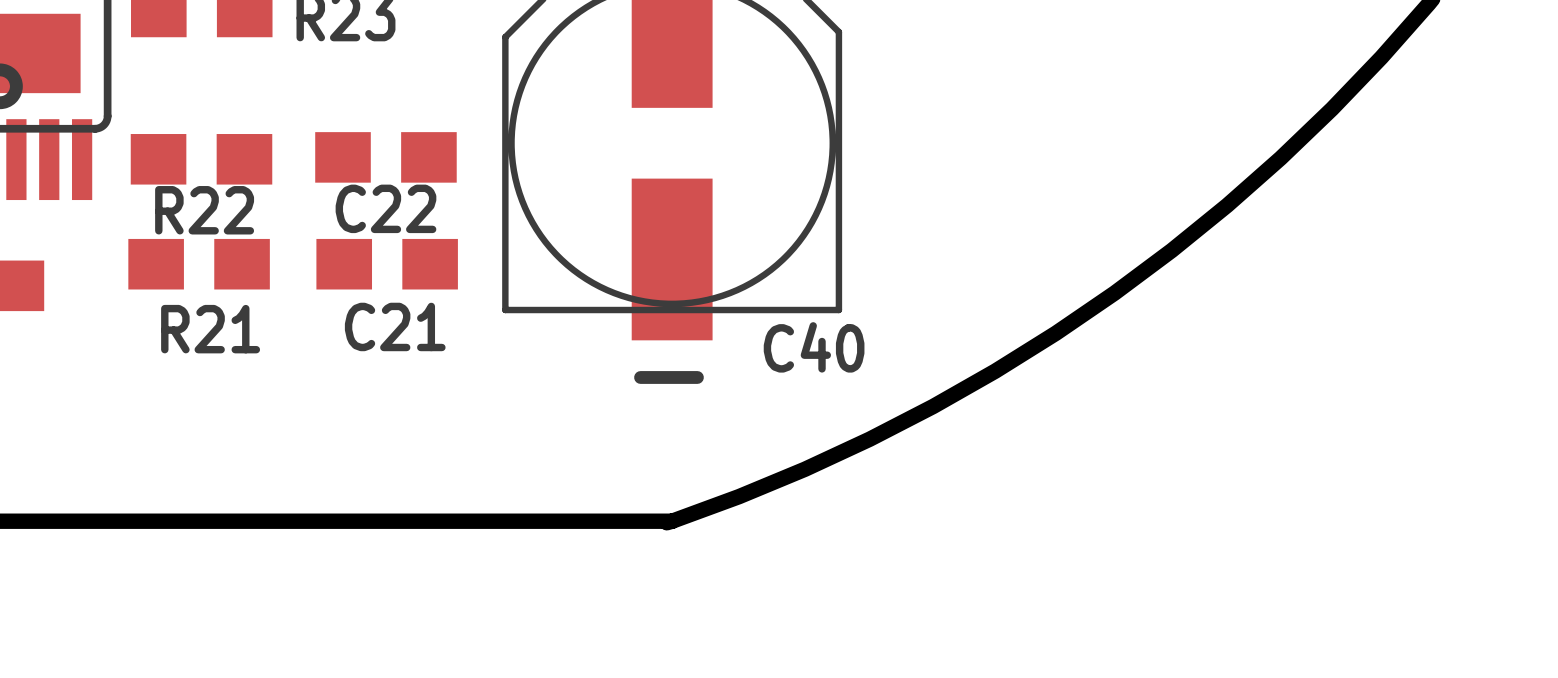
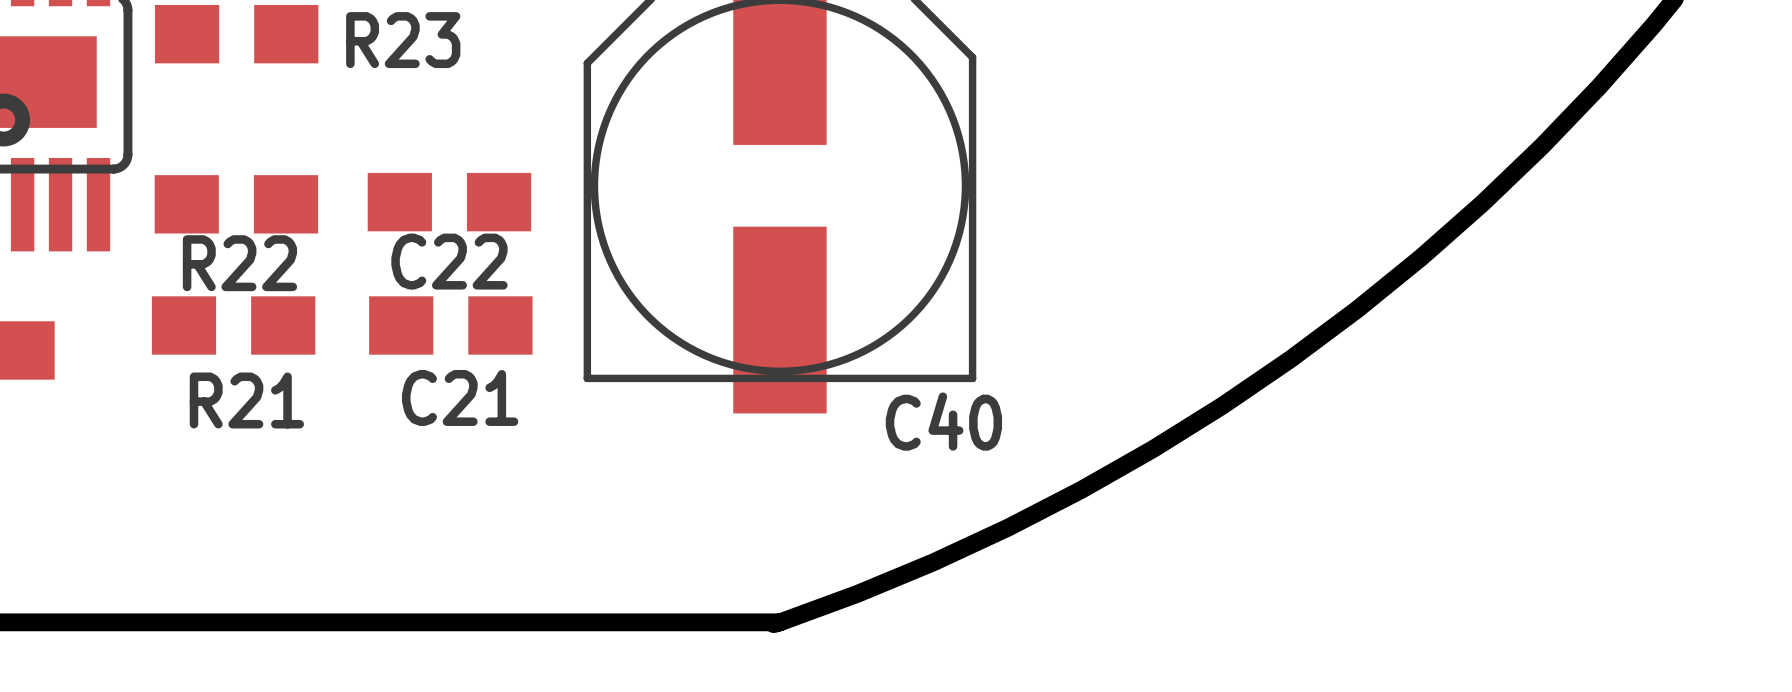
line: (640, 377) (697, 377) -> none

